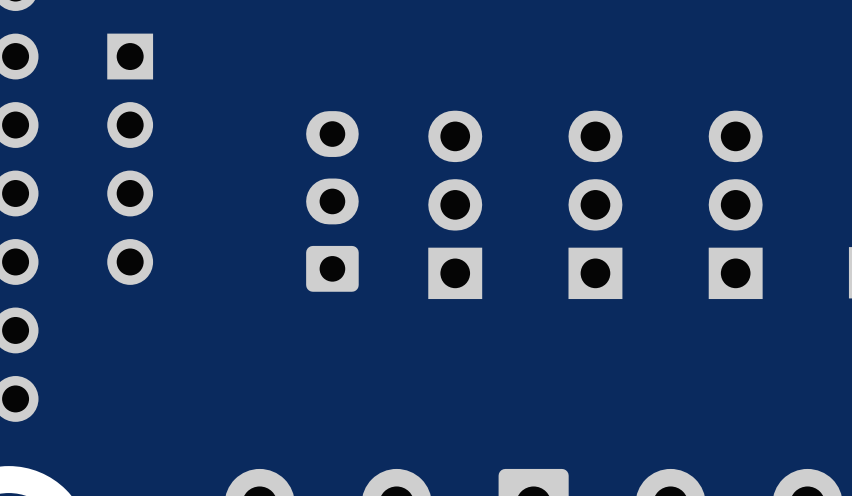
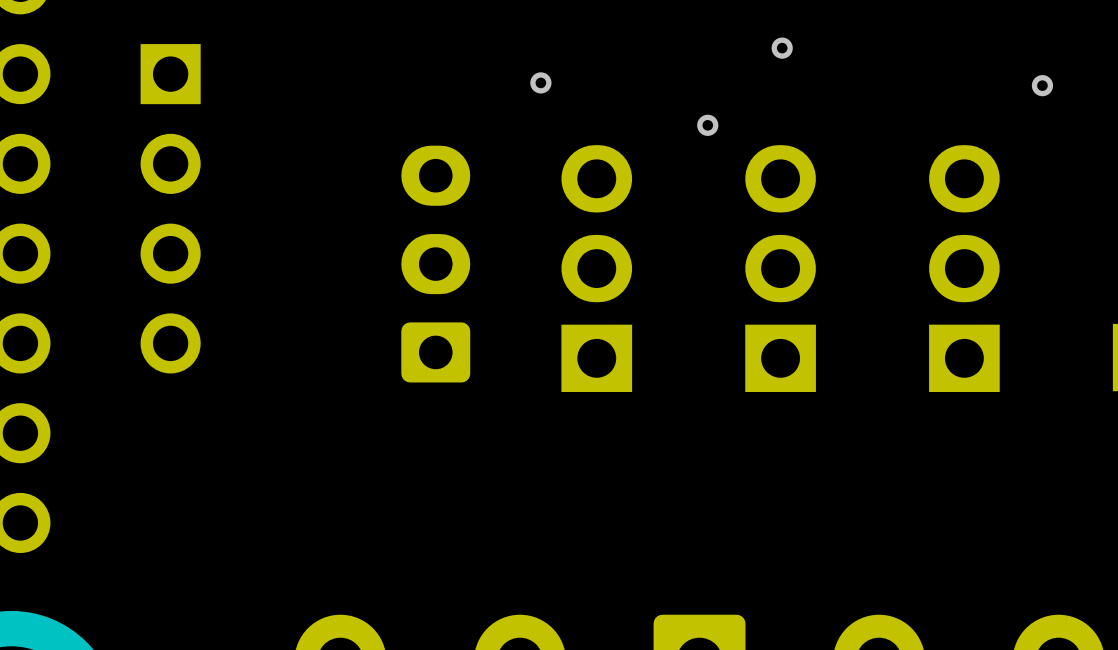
via: none -> (782, 48)
via: none -> (540, 82)
via: none -> (1042, 85)
via: none -> (707, 125)

